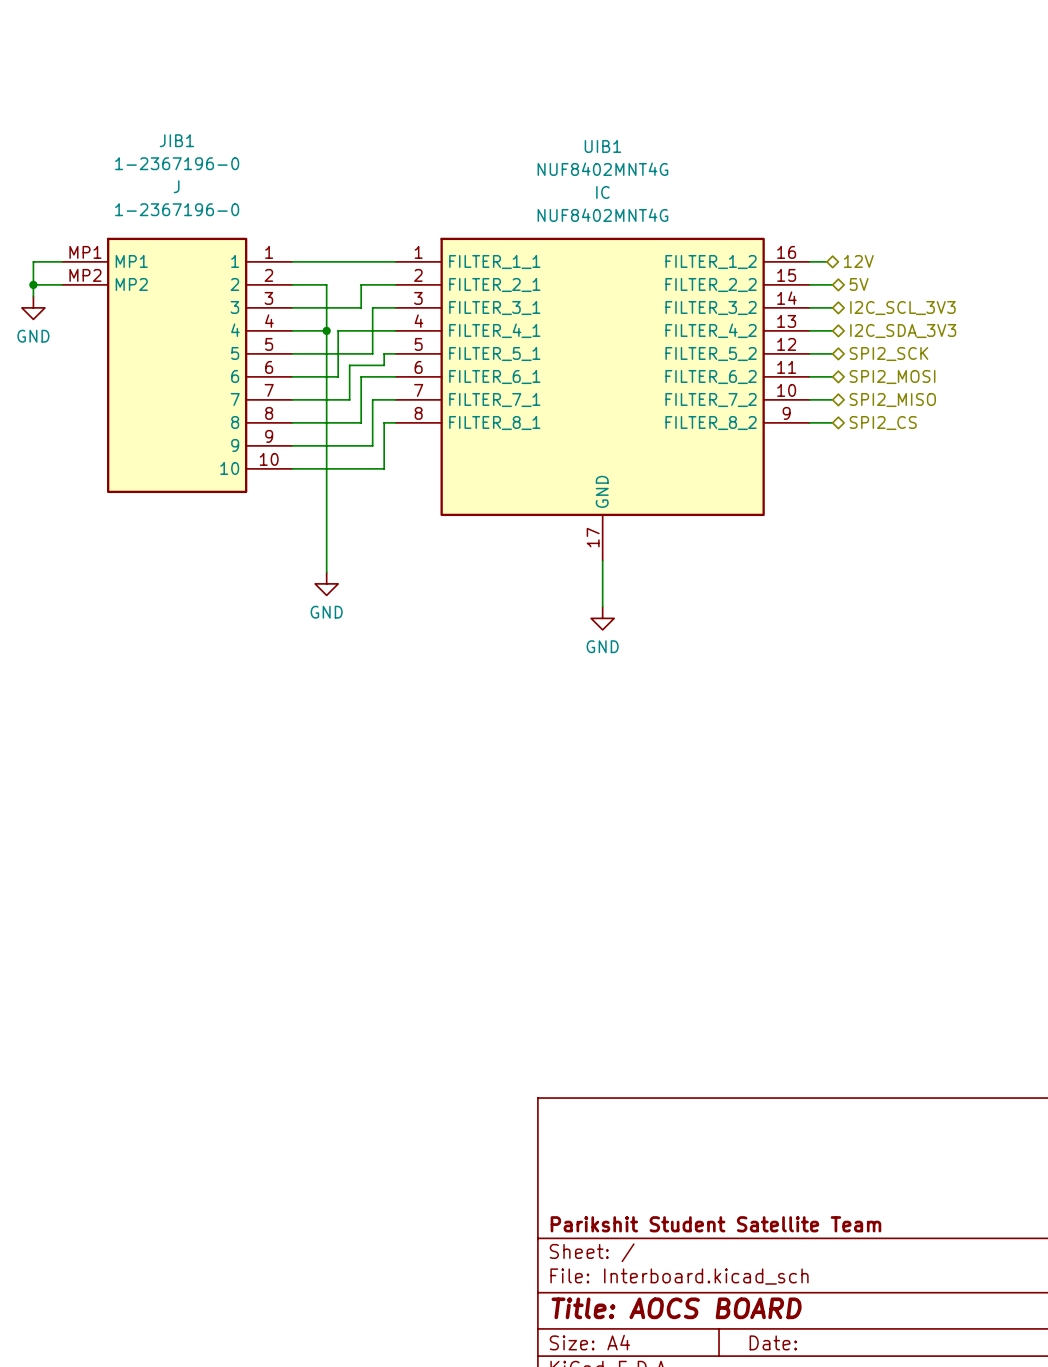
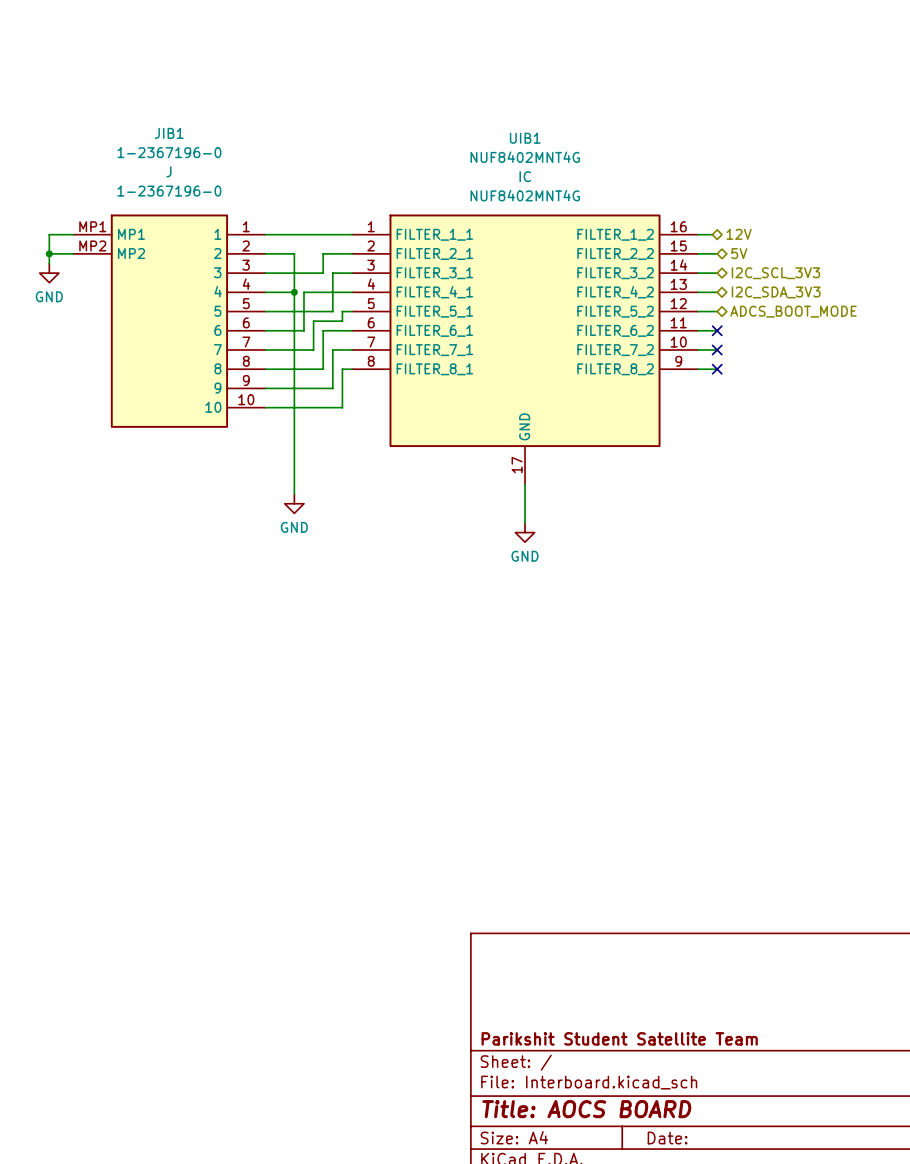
hierarchical label: SPI2_SCK (888, 354) -> ADCS_BOOT_MODE (793, 311)
no-connect mark: none -> (717, 330)
hierarchical label: SPI2_MOSI (892, 377) -> none
no-connect mark: none -> (717, 349)
hierarchical label: SPI2_MISO (892, 400) -> none
no-connect mark: none -> (717, 369)
hierarchical label: SPI2_CS (883, 423) -> none

